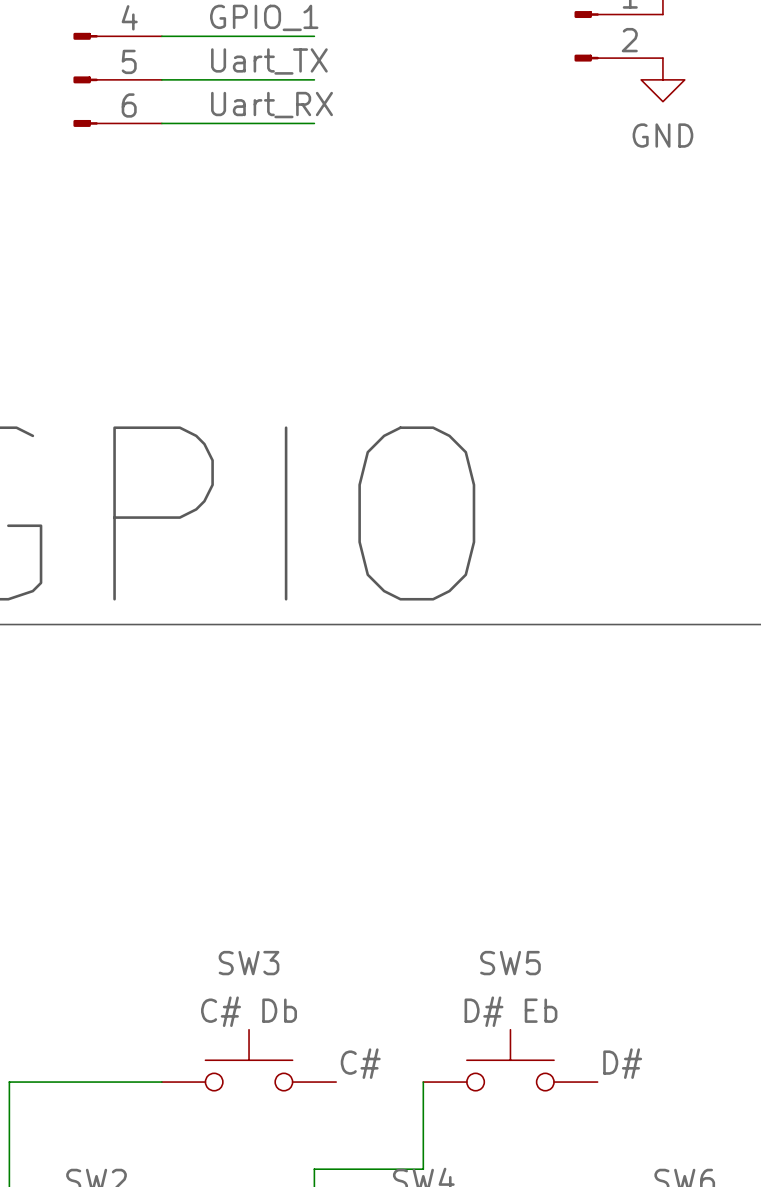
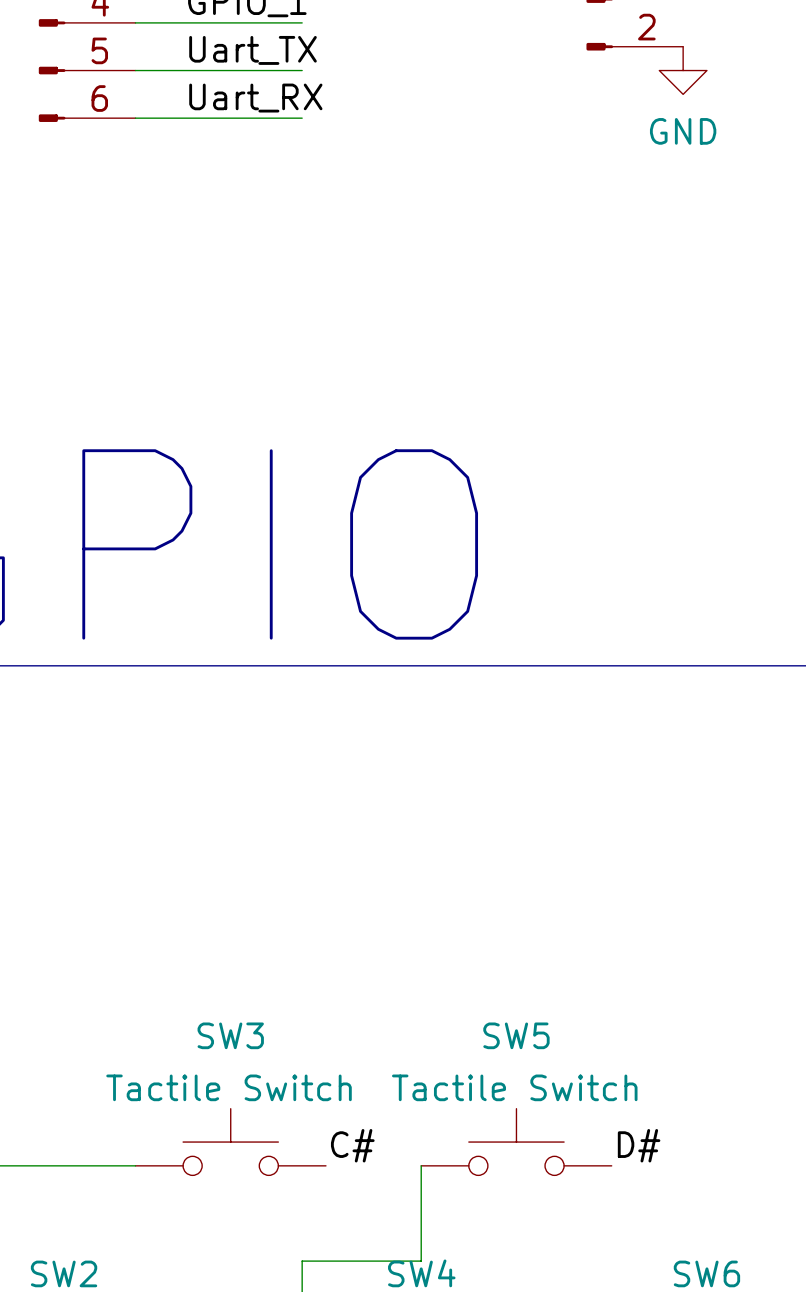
SW3 value: C# Db (249, 1011) -> Tactile Switch (229, 1087)
SW5 value: D# Eb (510, 1011) -> Tactile Switch (514, 1087)

